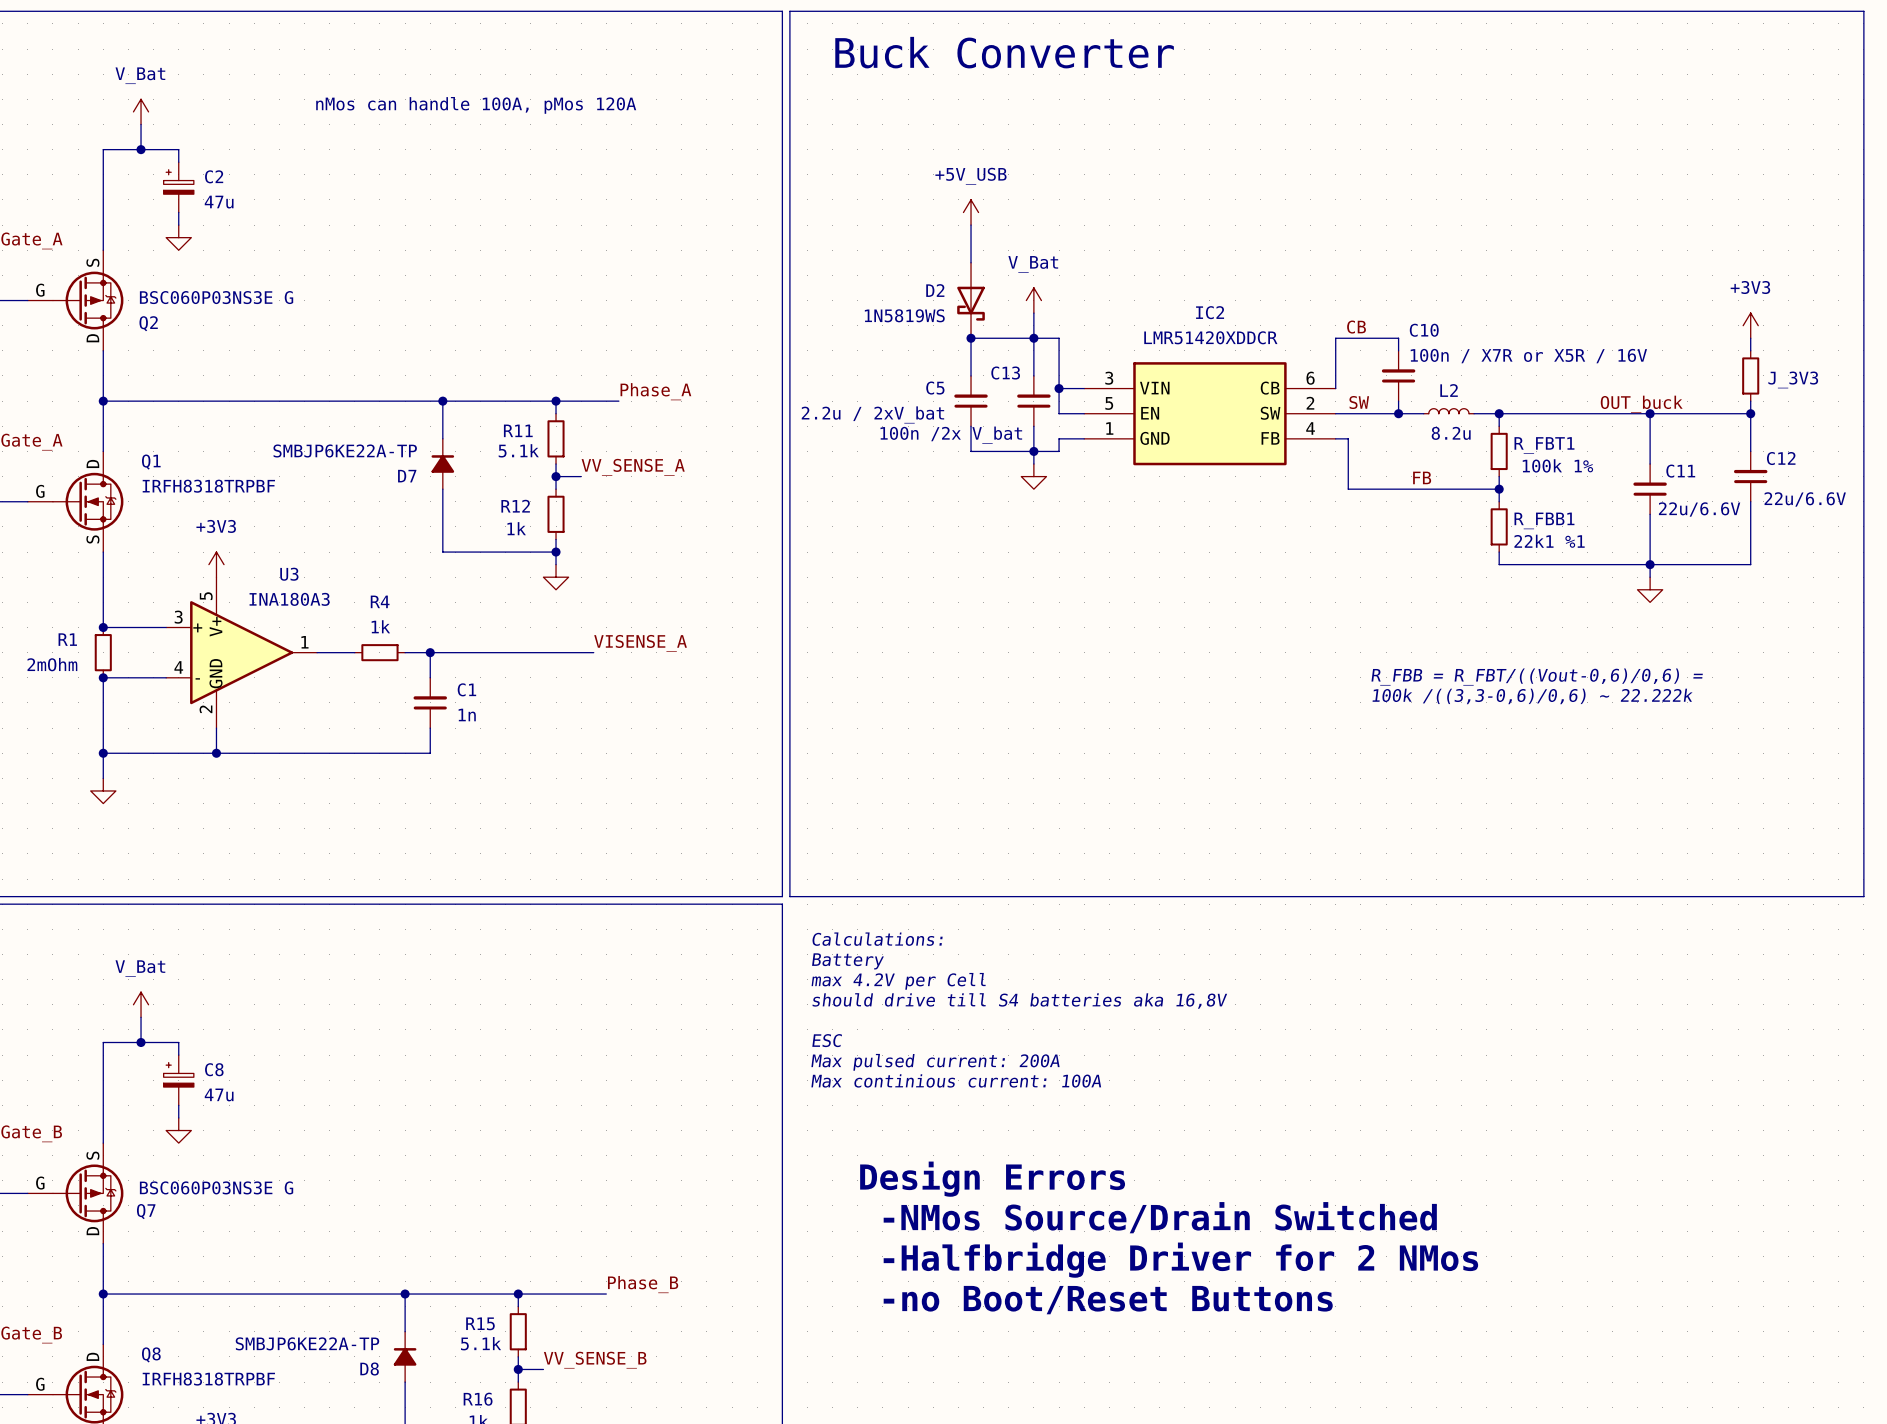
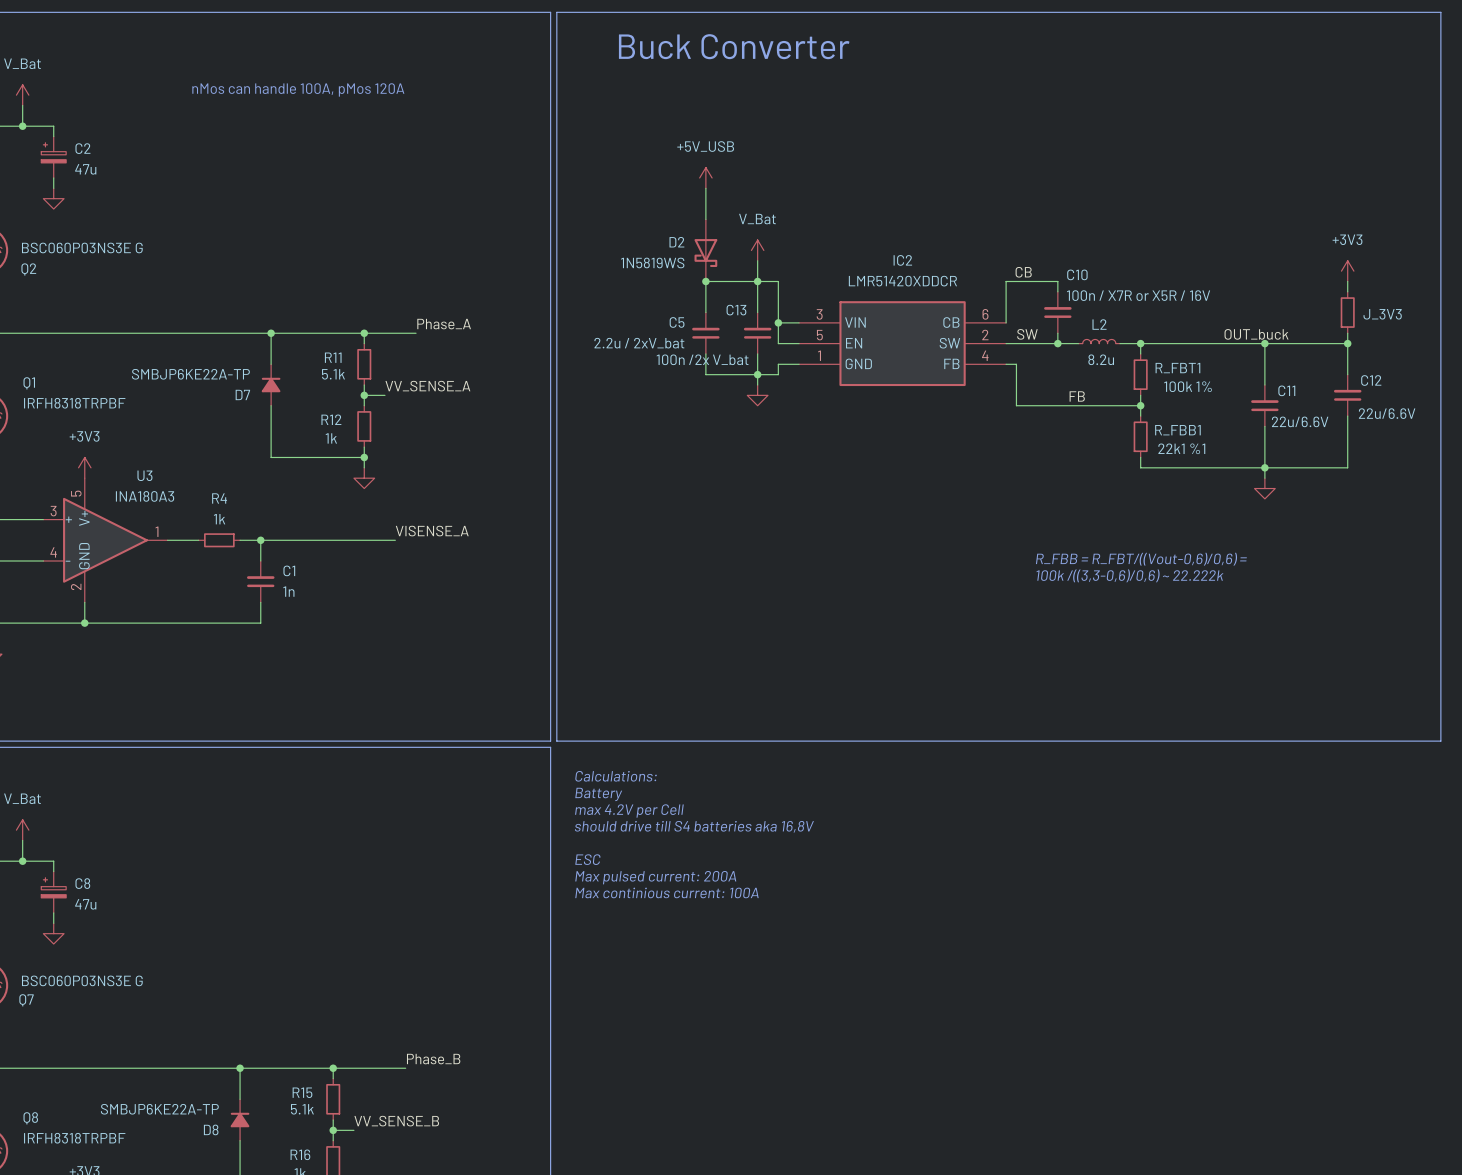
text: Design Errors (992, 1179) -> none
text: -NMos Source/Drain Switched (1160, 1217) -> none
text: -Halfbridge Driver for 2 NMos (1180, 1260) -> none
text: -no Boot/Reset Buttons (1108, 1300) -> none

